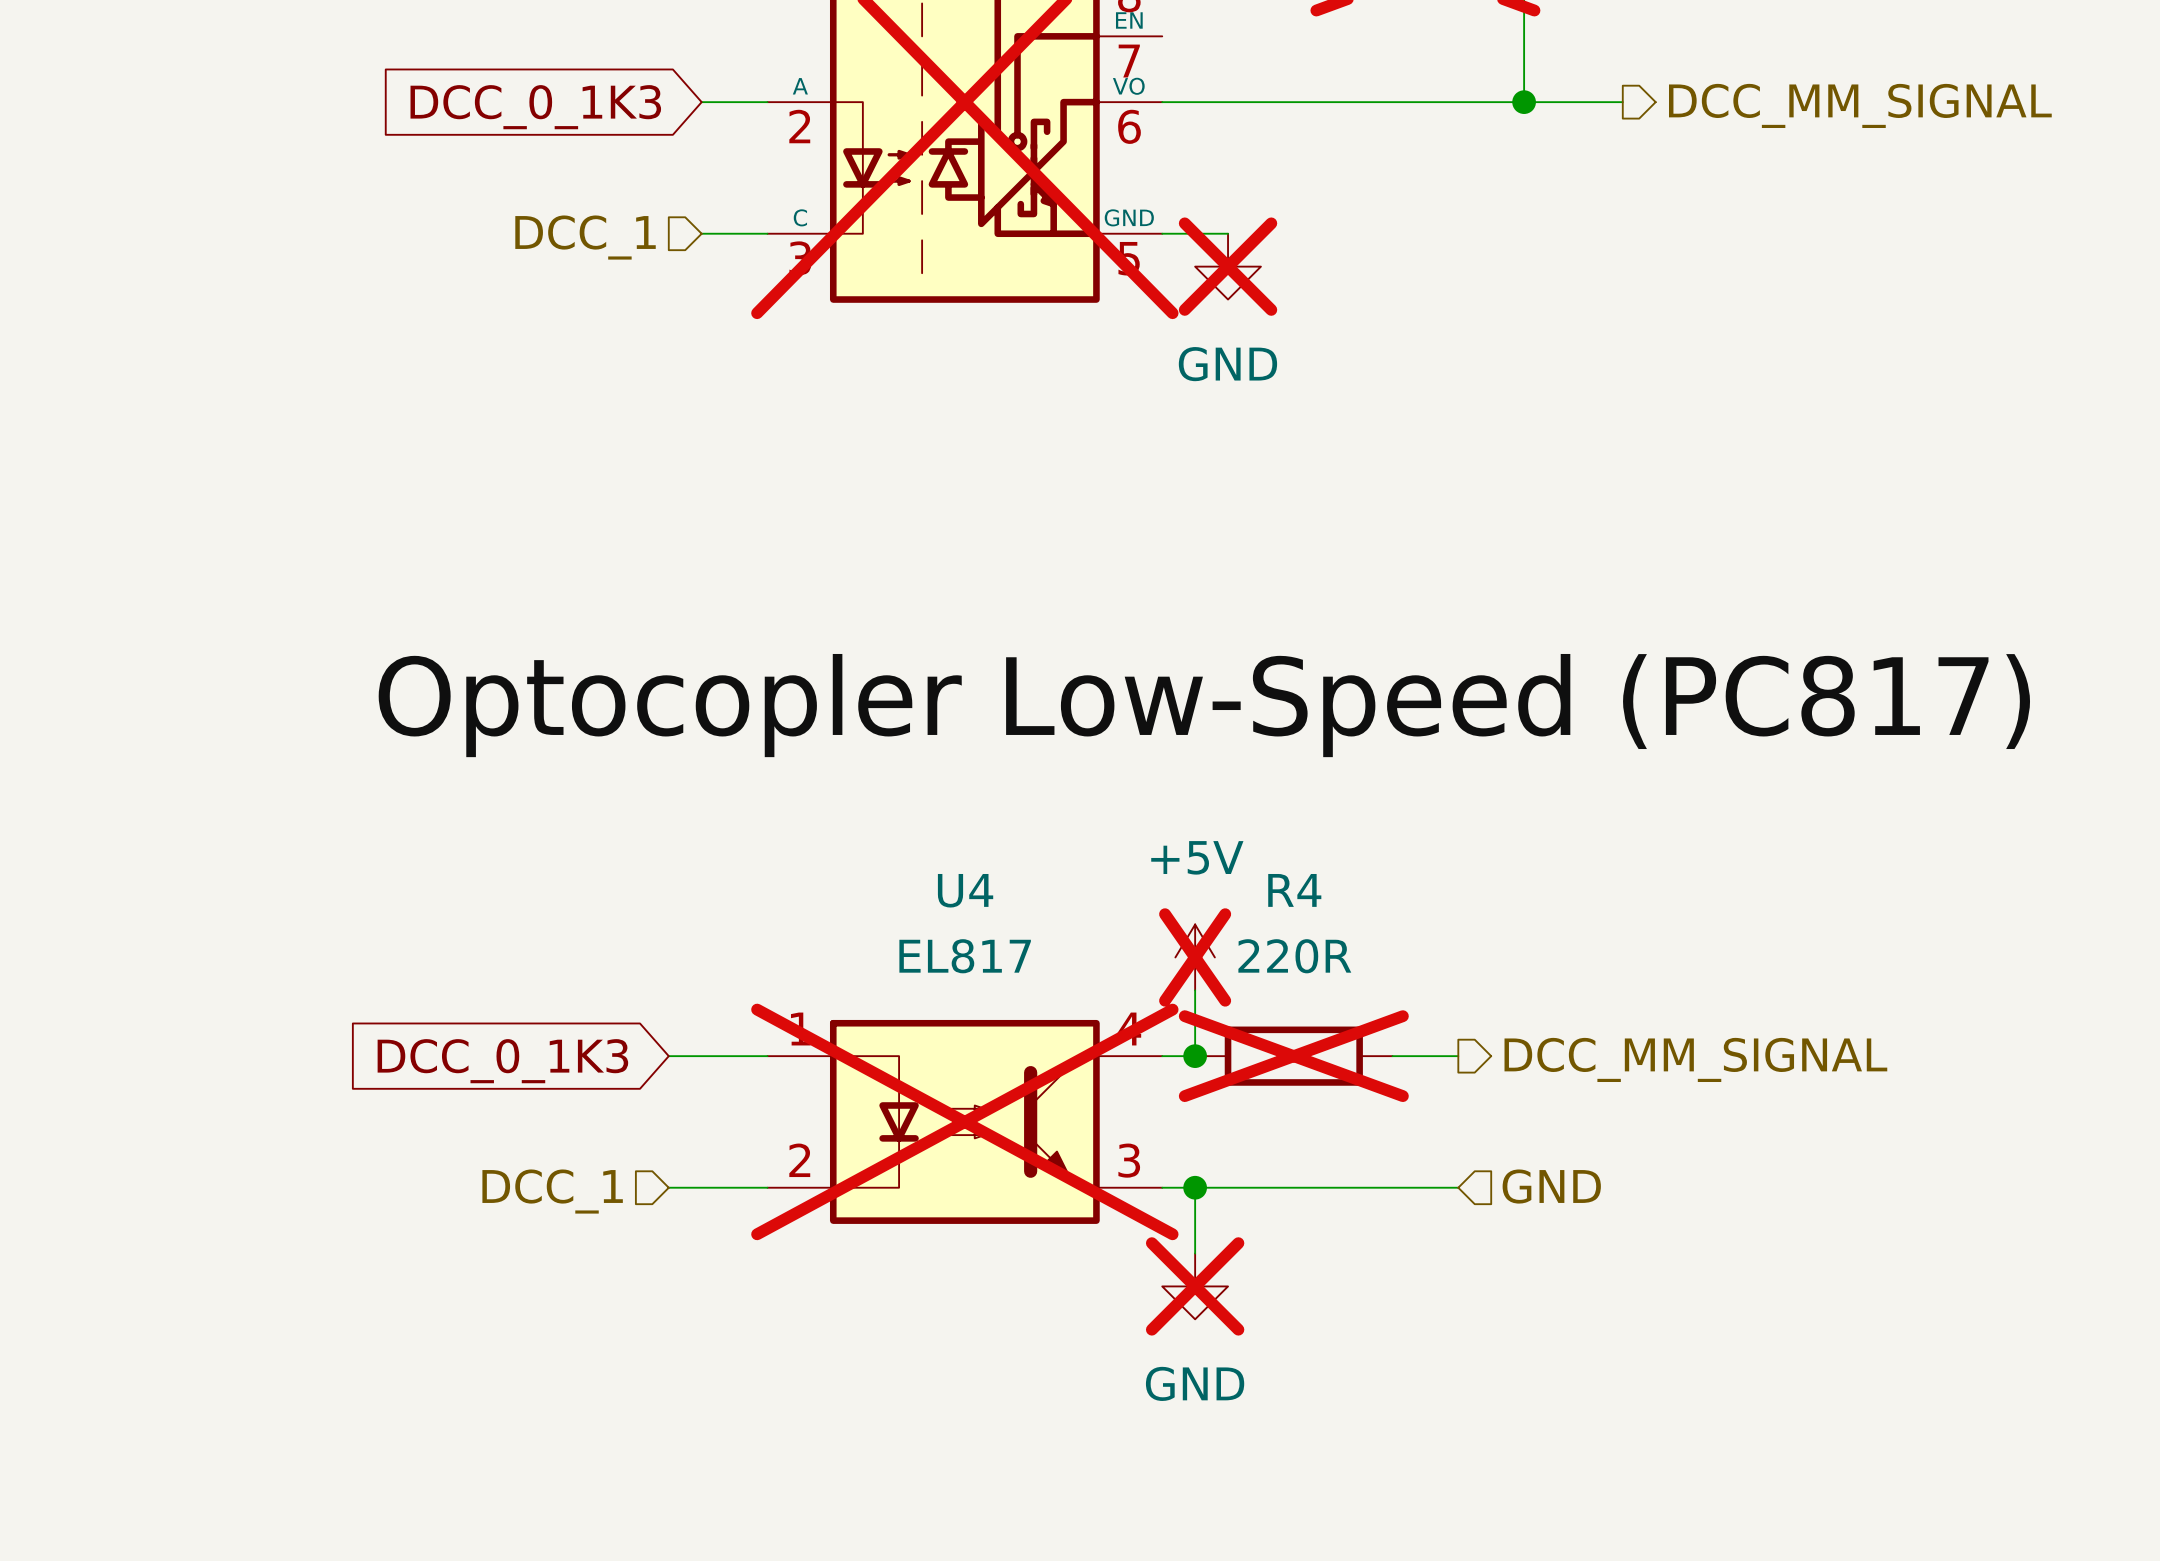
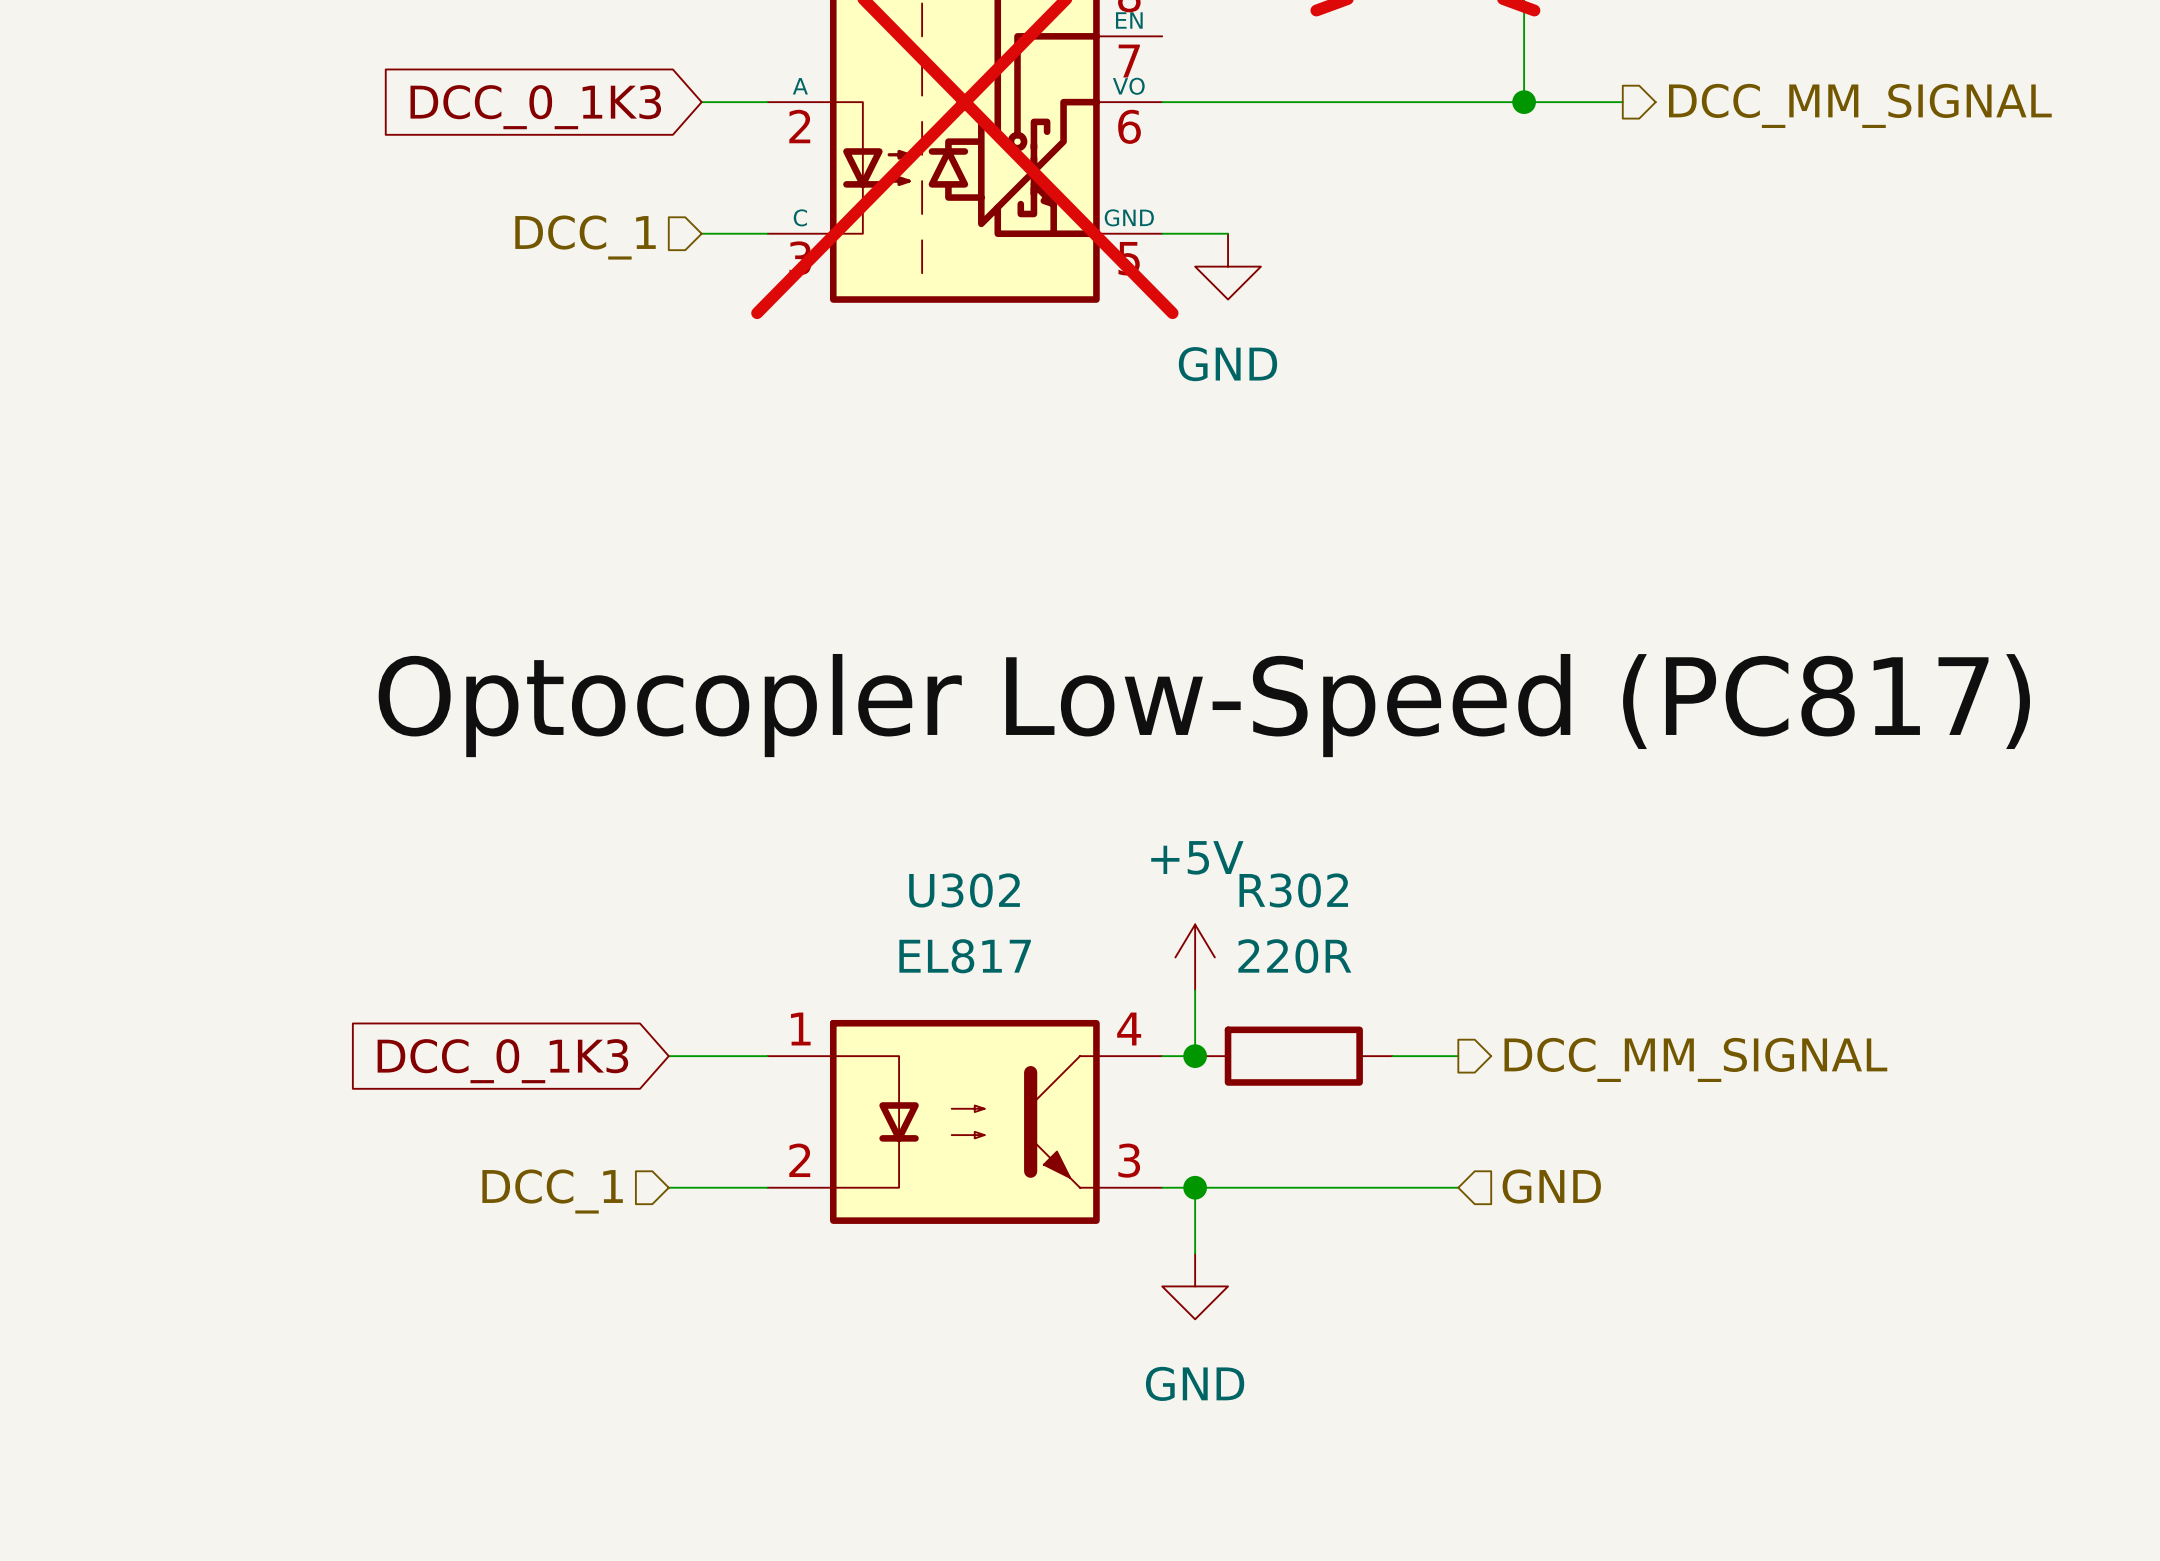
power symbol do-not-place cross: (1228, 266) -> none
U4 name: U4 (965, 890) -> U302 (964, 890)
R4 name: R4 (1294, 890) -> R302 (1293, 890)
power symbol do-not-place cross: (1195, 957) -> none
R4 do-not-place cross: (1293, 1056) -> none
U4 do-not-place cross: (964, 1121) -> none
power symbol do-not-place cross: (1195, 1286) -> none

